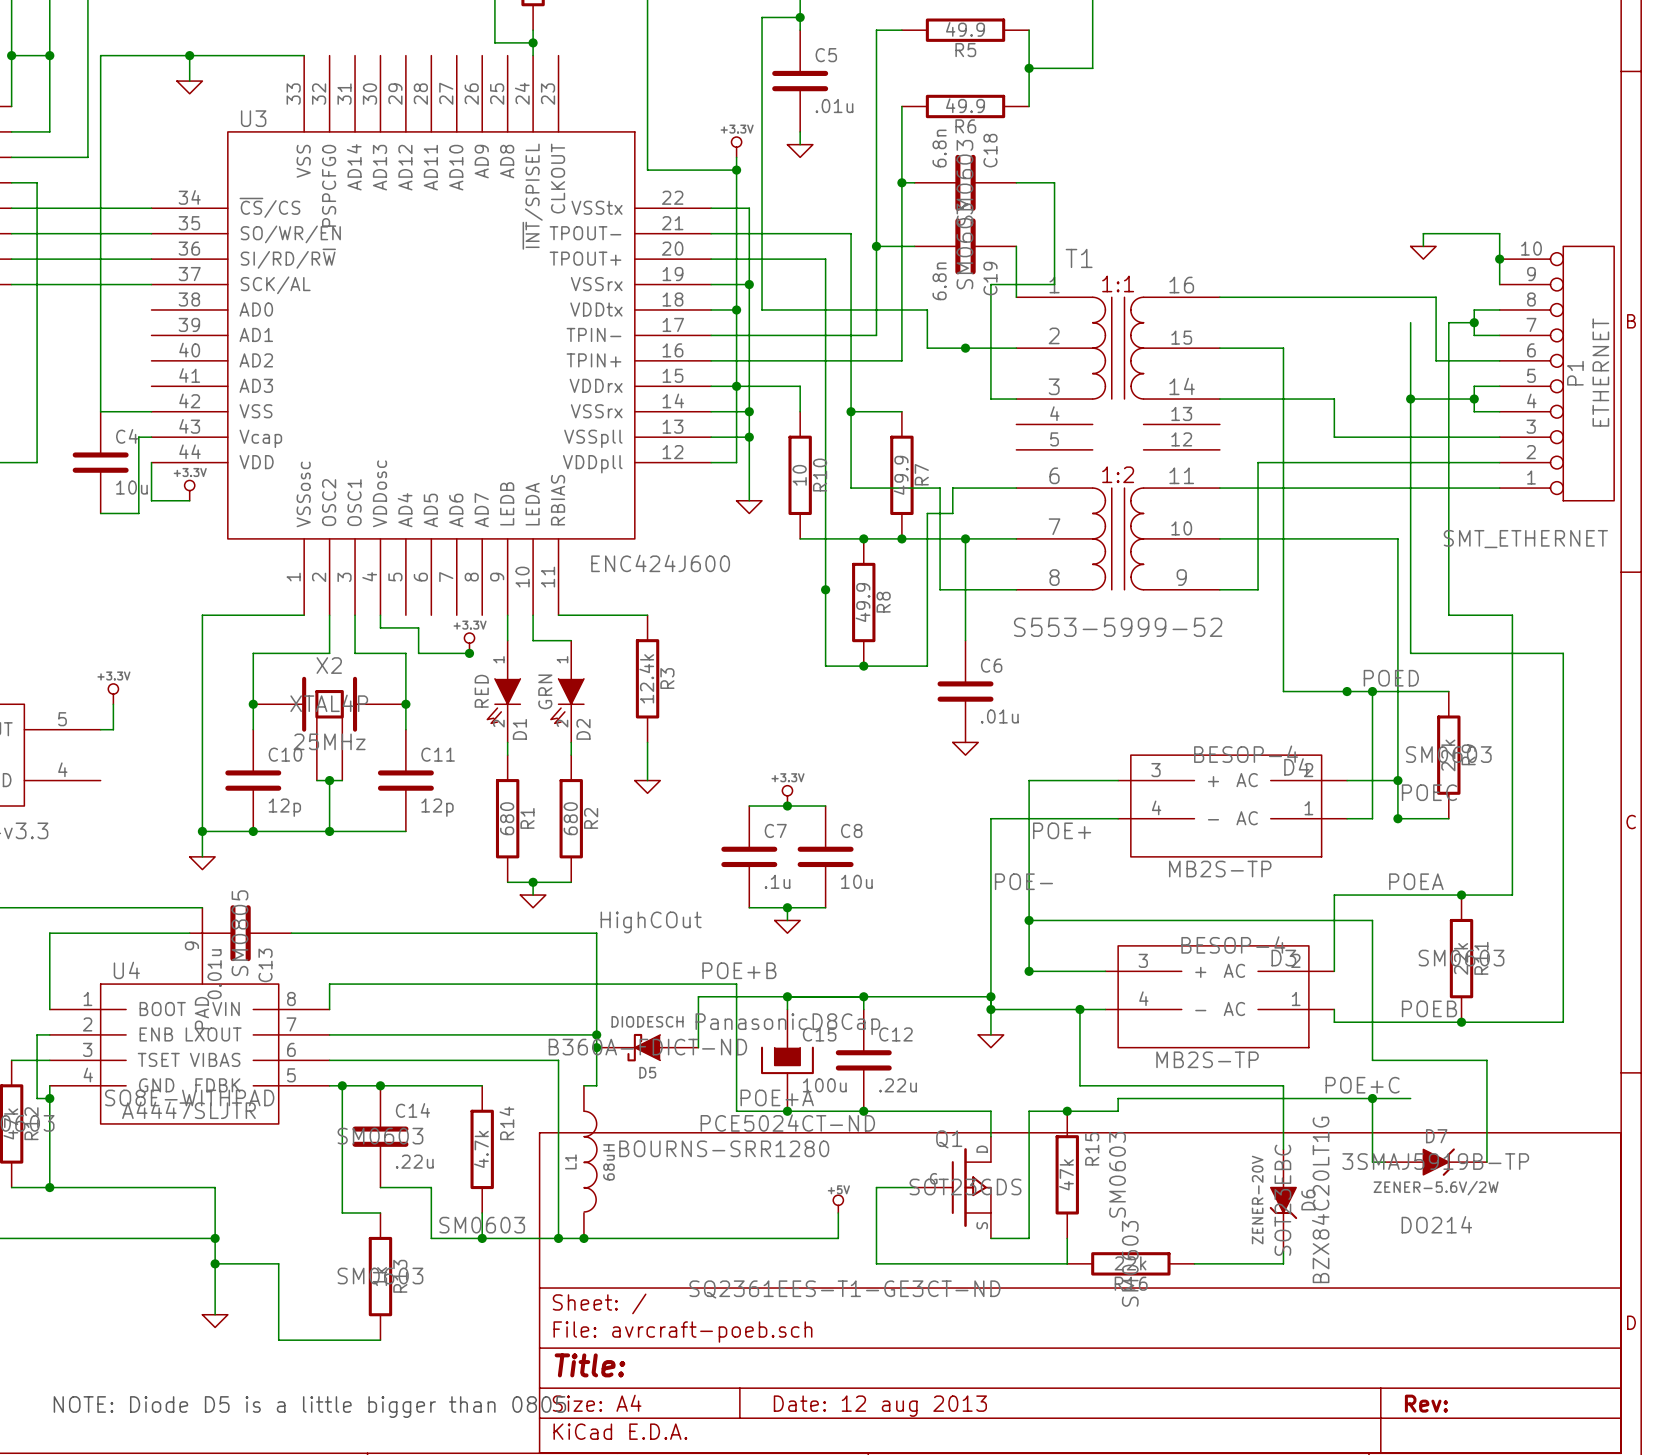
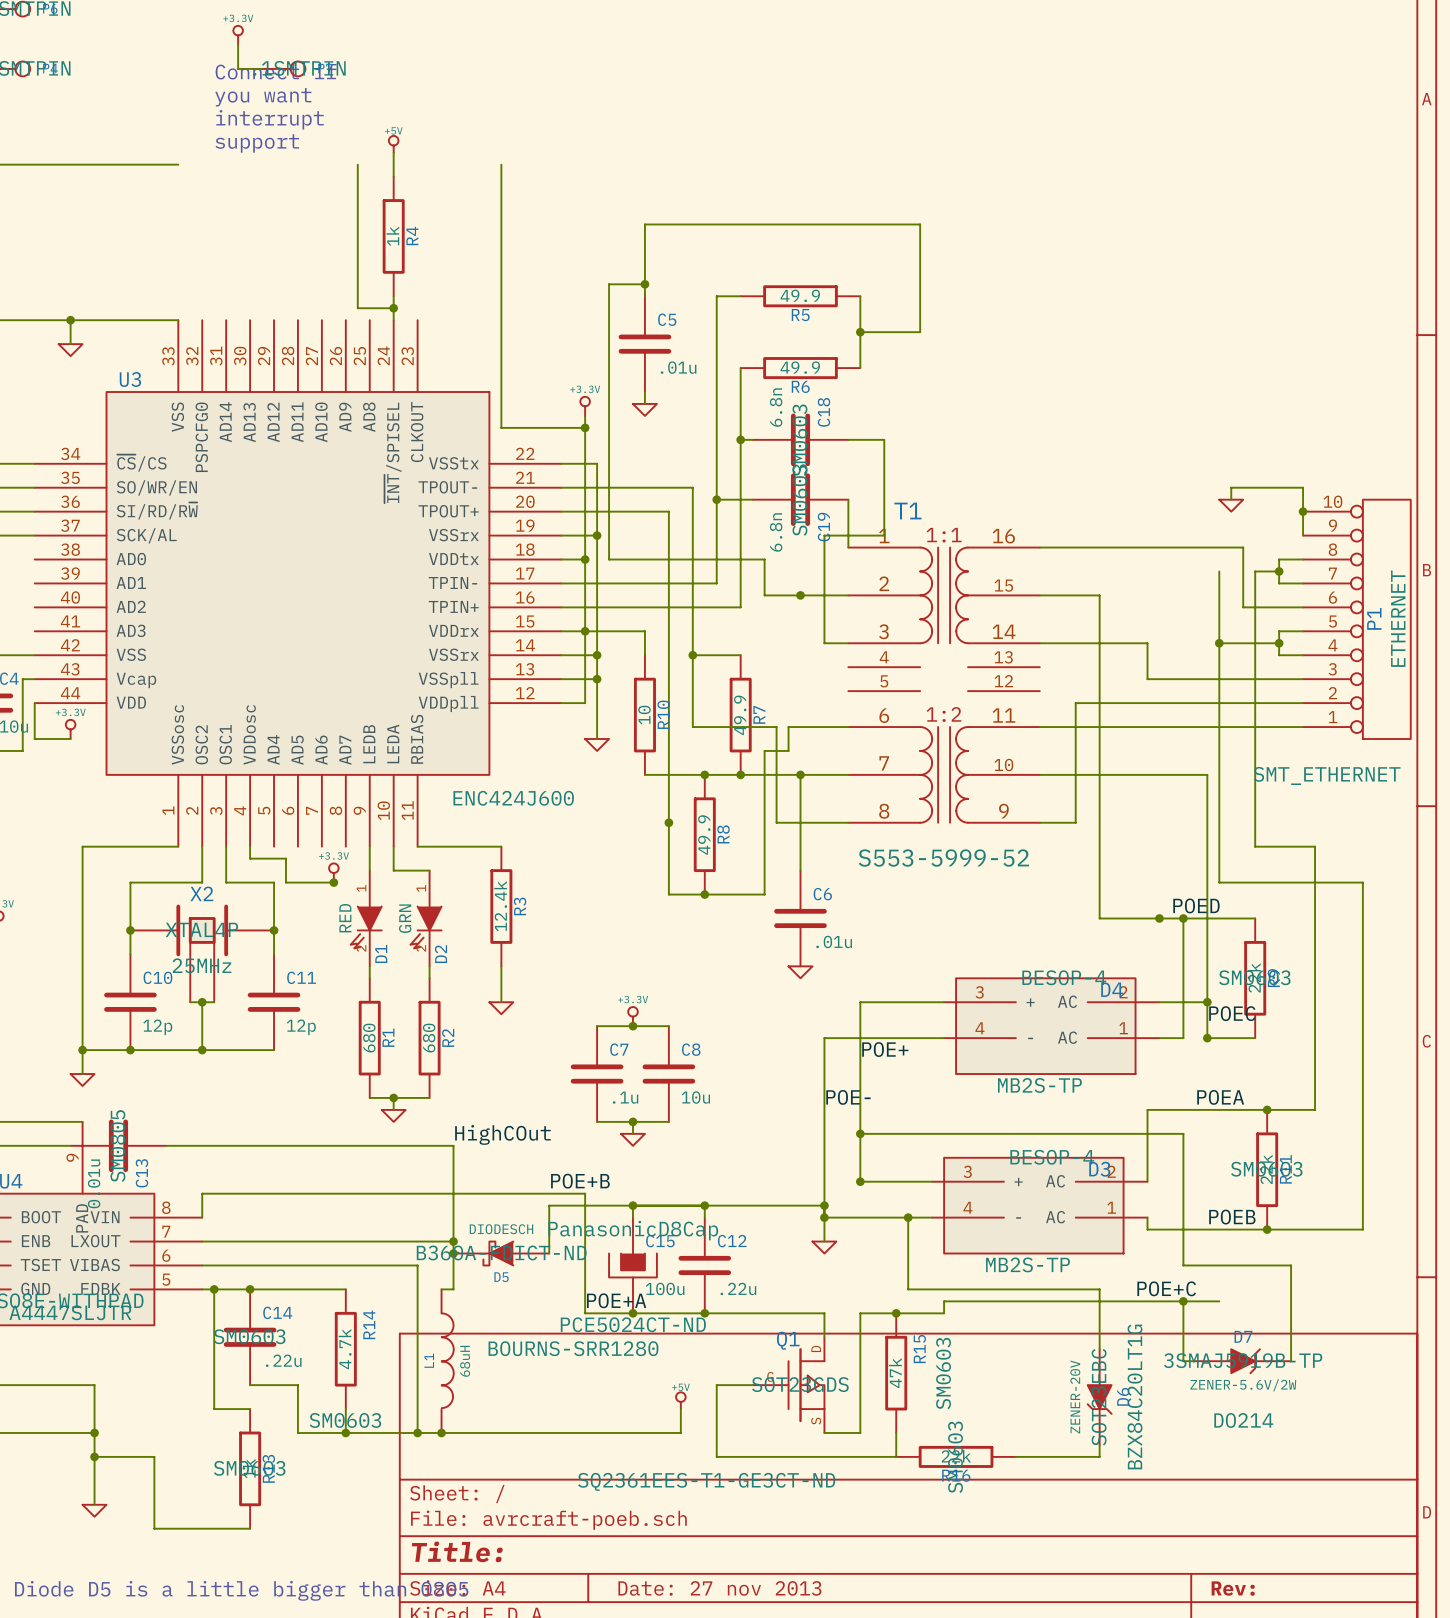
title block: Date: 12 aug 2013 (880, 1406) -> Date: 27 nov 2013 (719, 1588)

